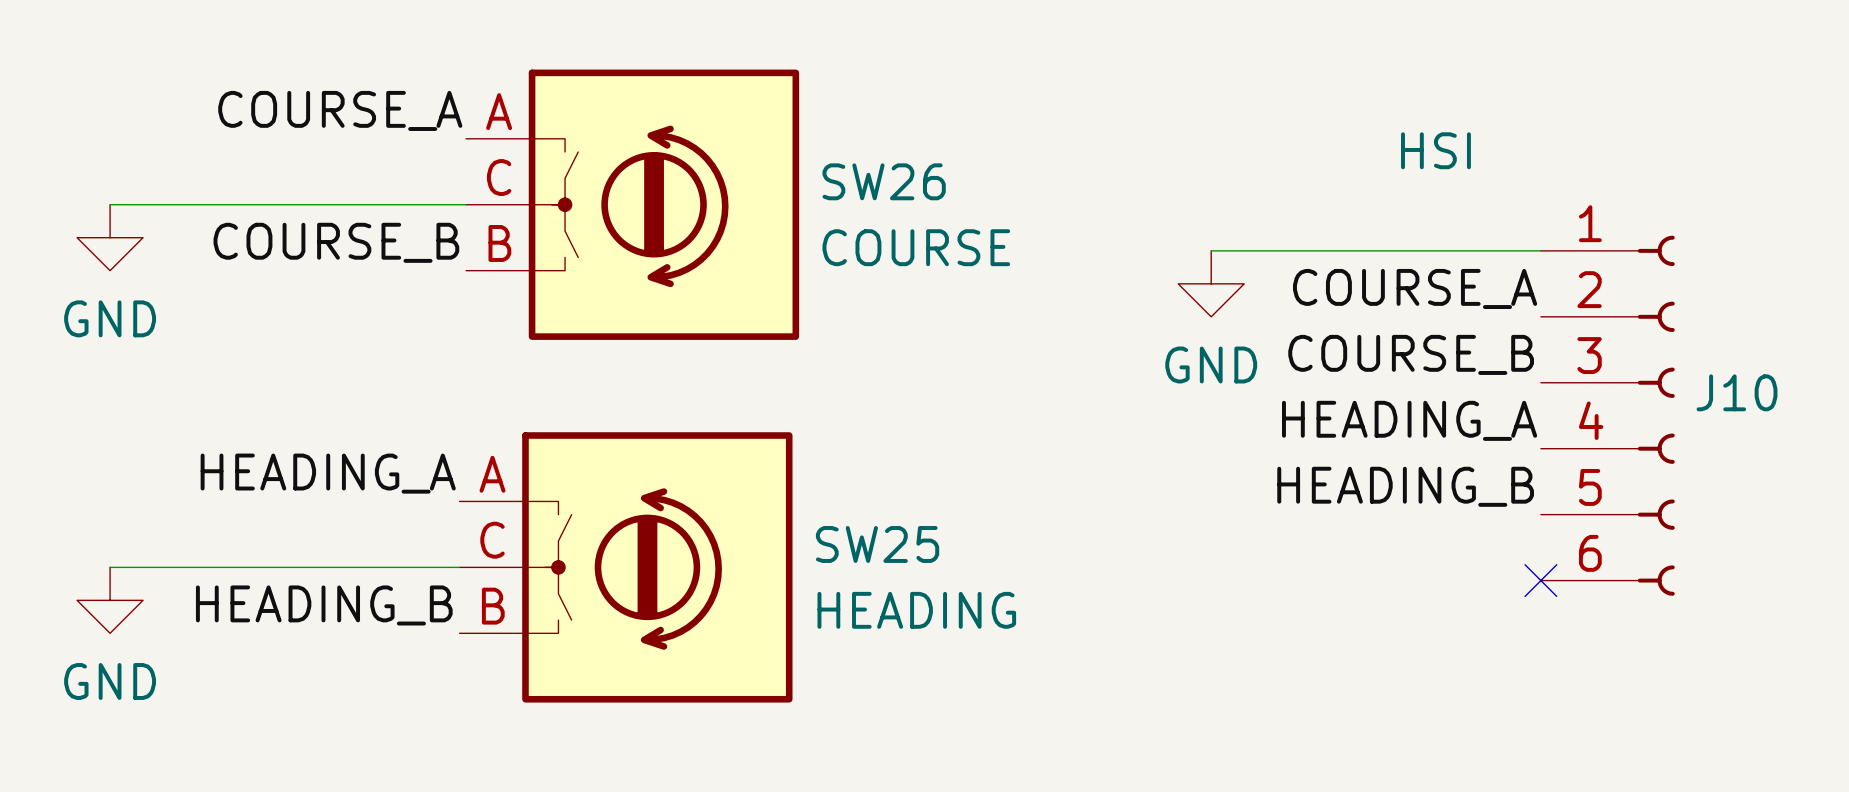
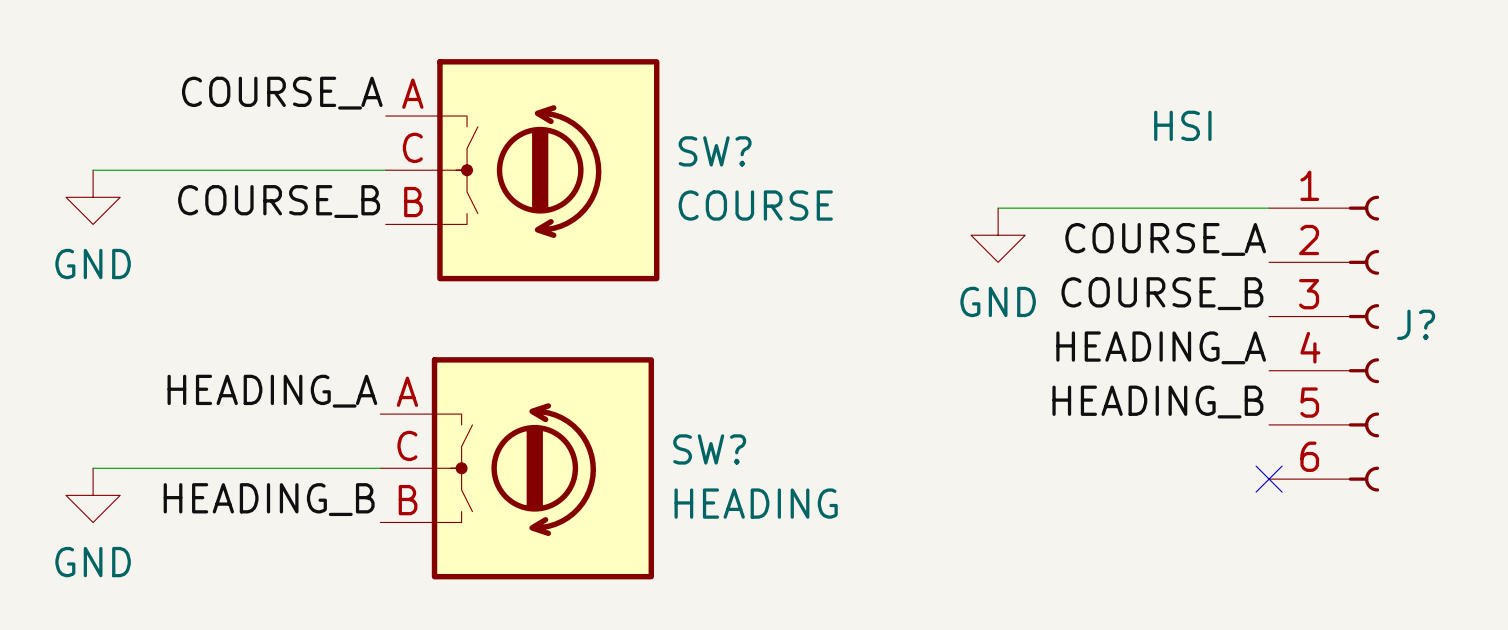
SW26 name: SW26 (884, 181) -> SW? (715, 151)
J10 name: J10 (1737, 392) -> J? (1416, 324)
SW25 name: SW25 (877, 544) -> SW? (709, 449)

